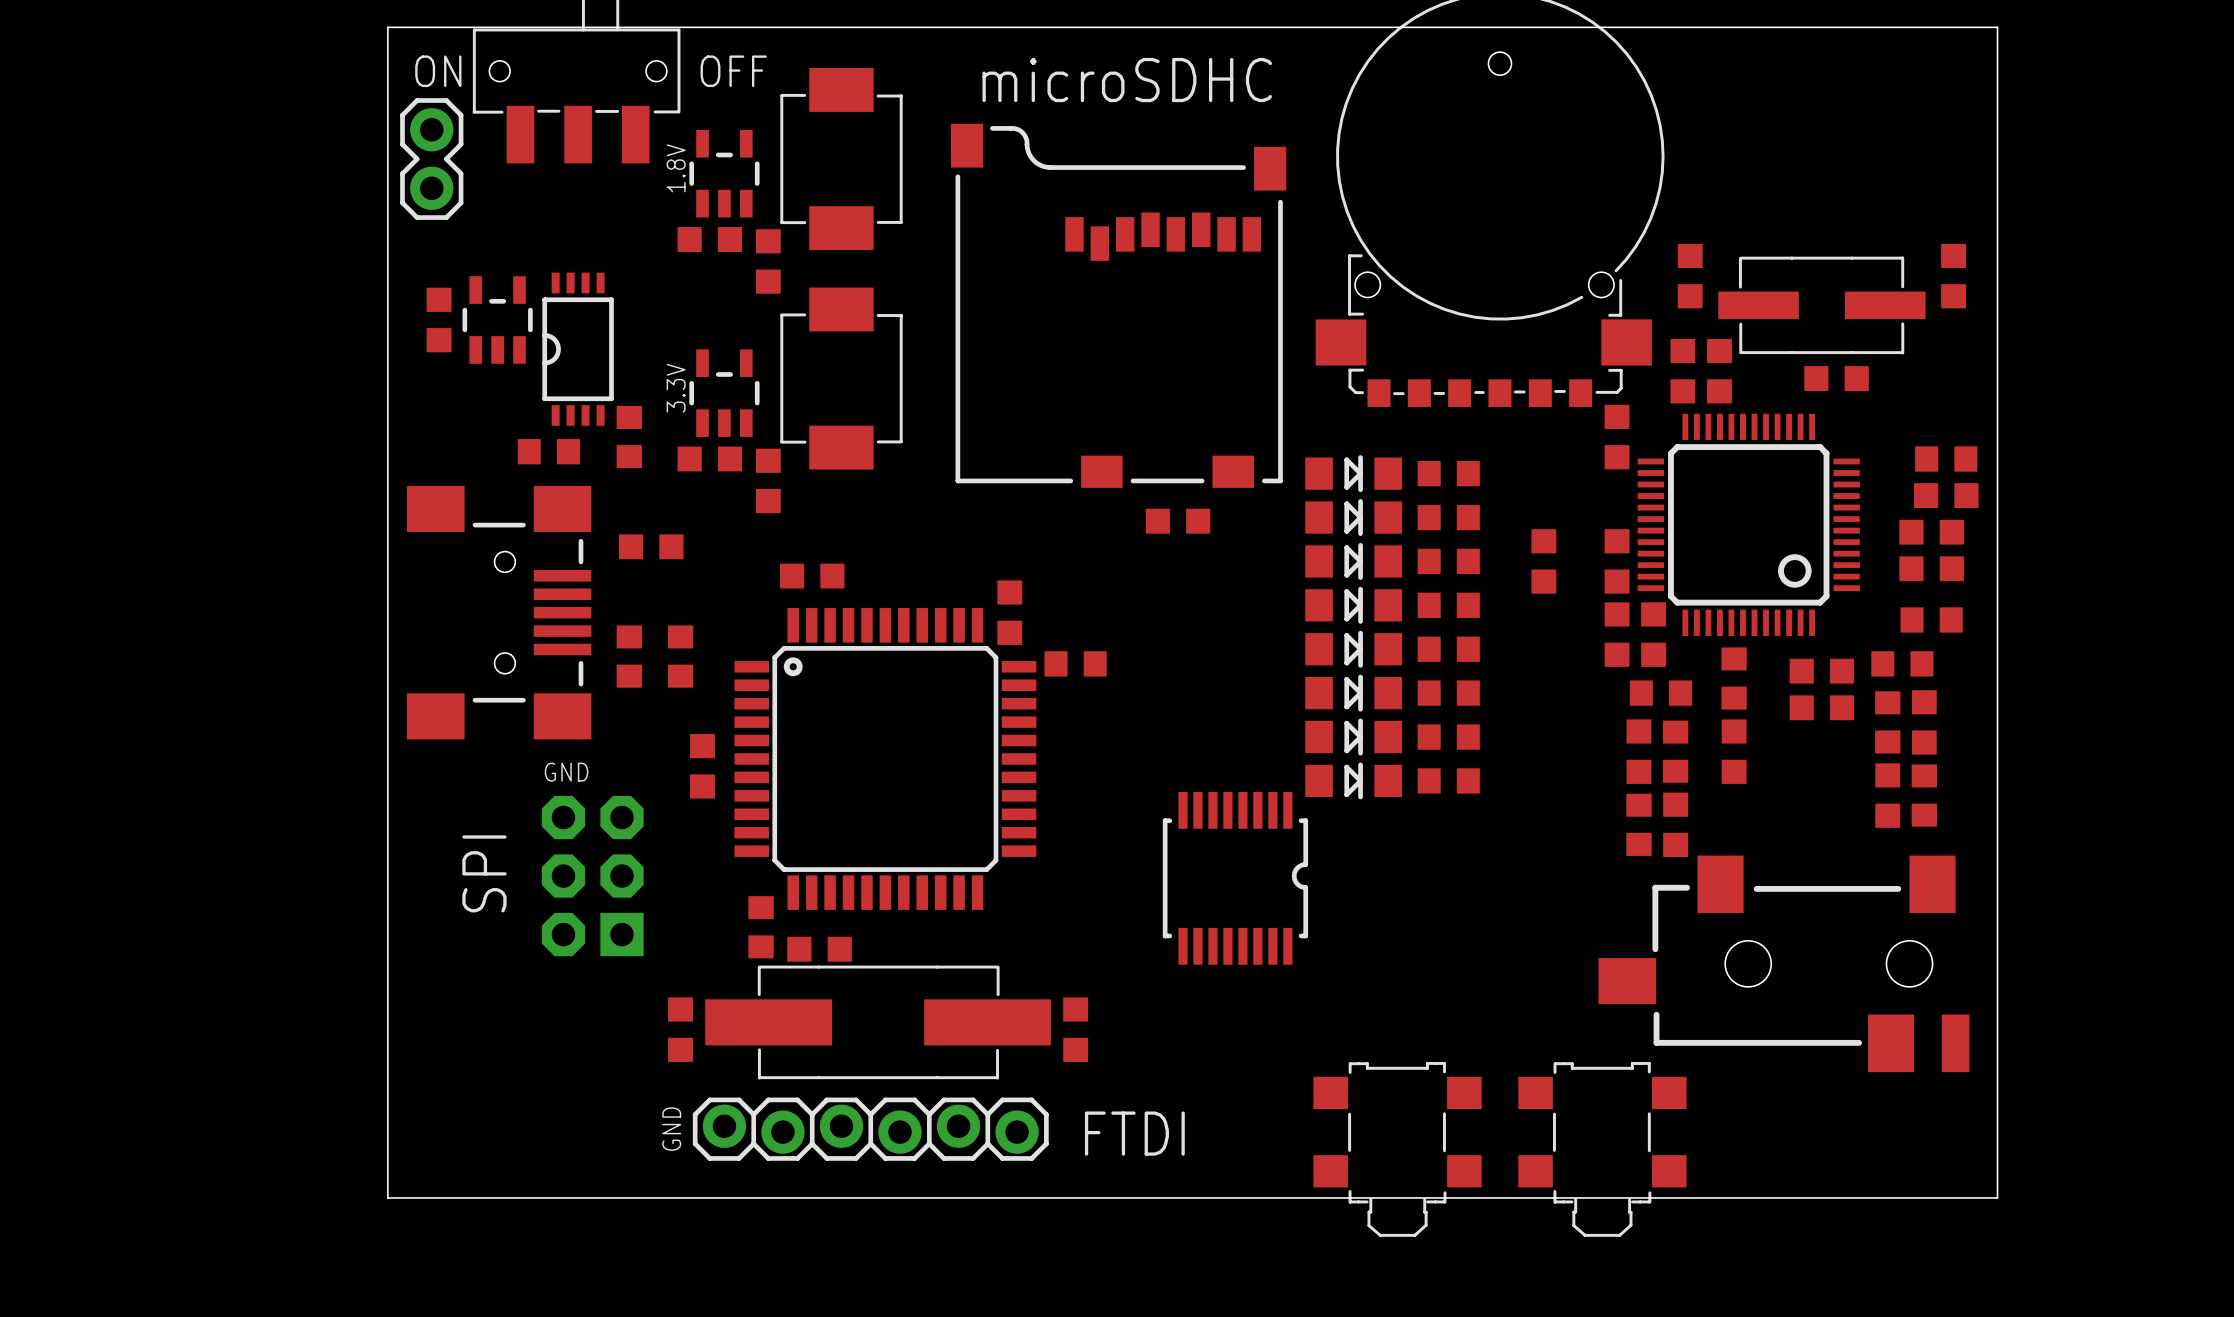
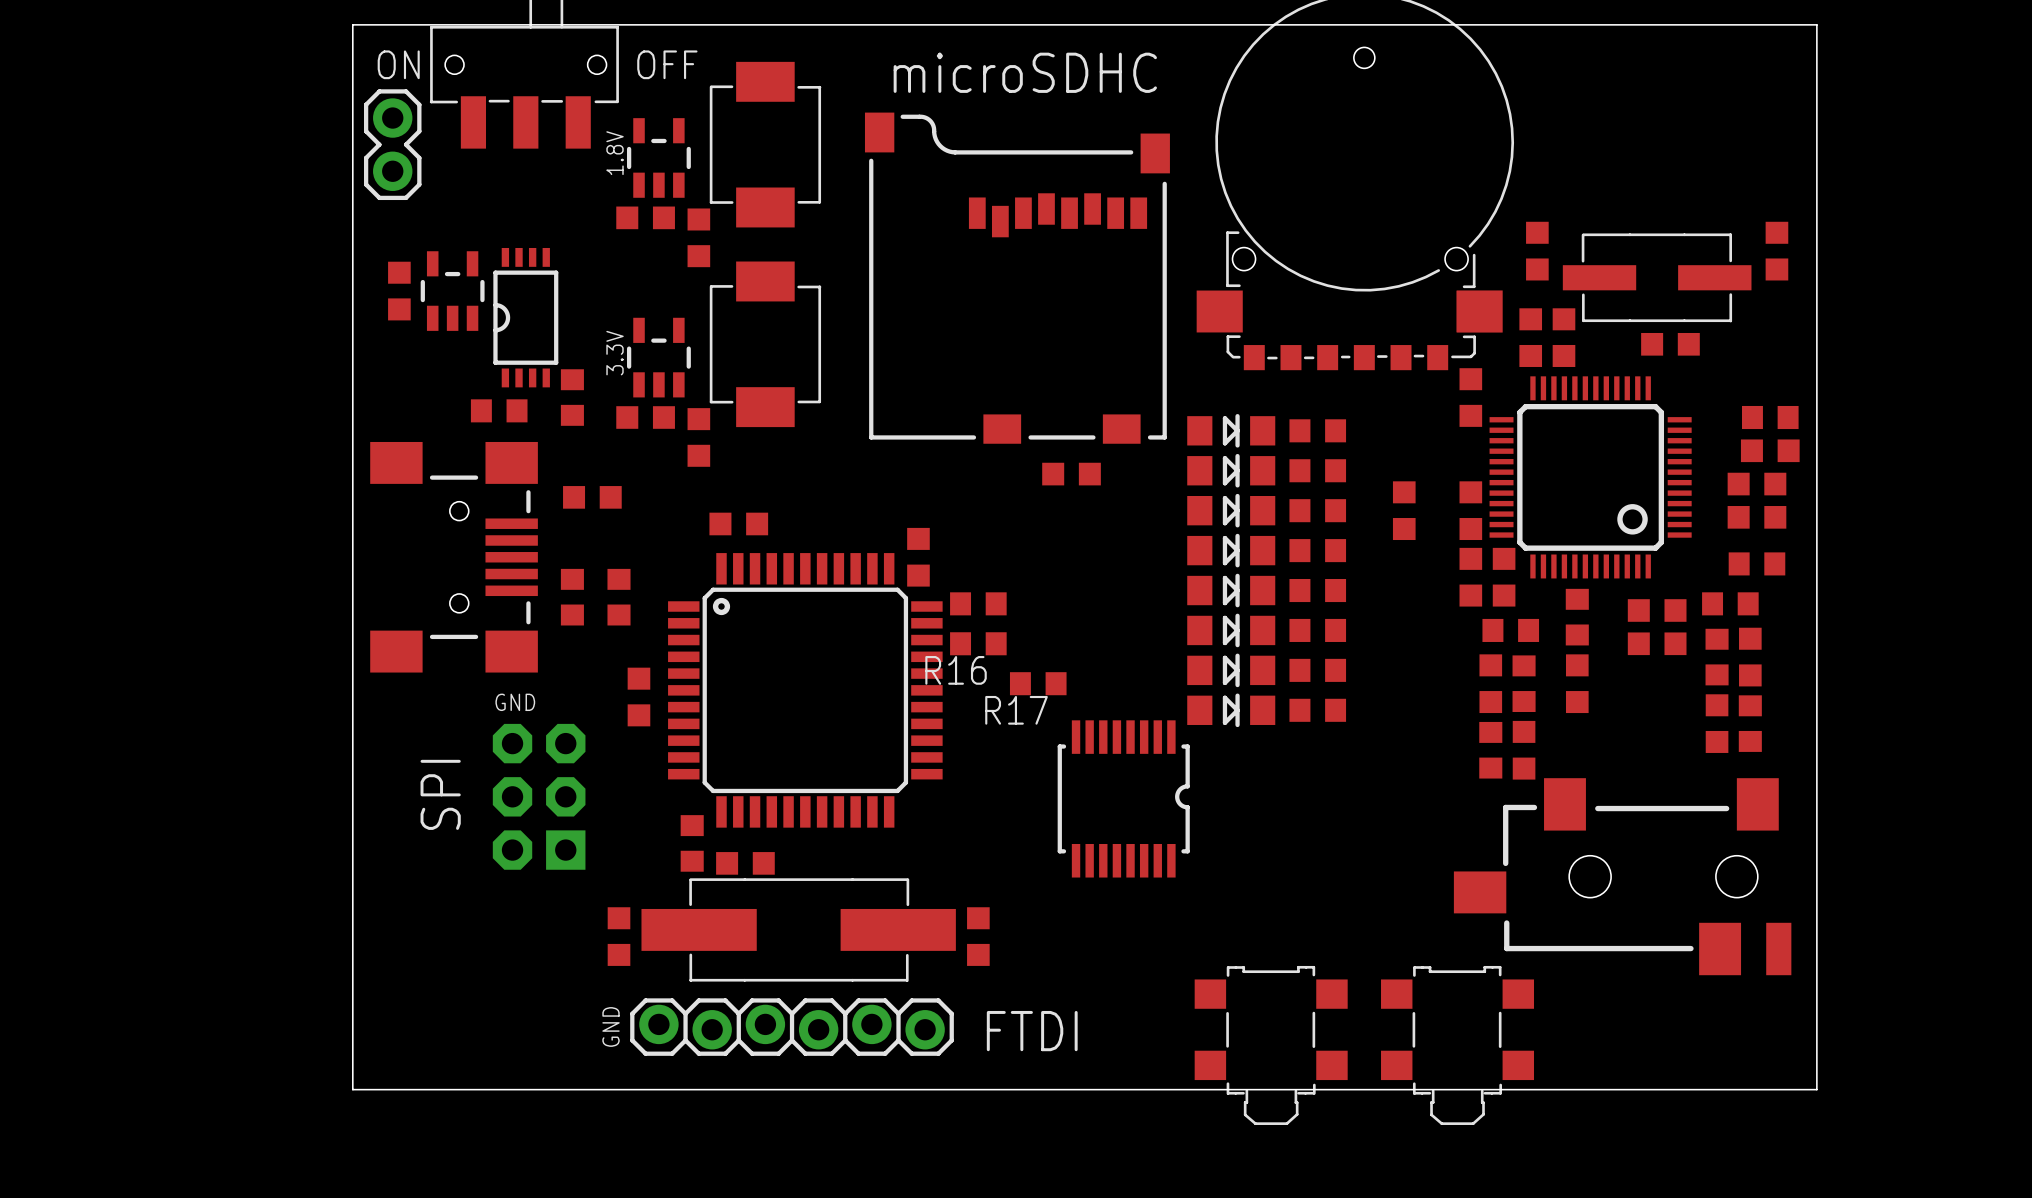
R16: none -> (978, 643)
R17: none -> (1038, 683)

